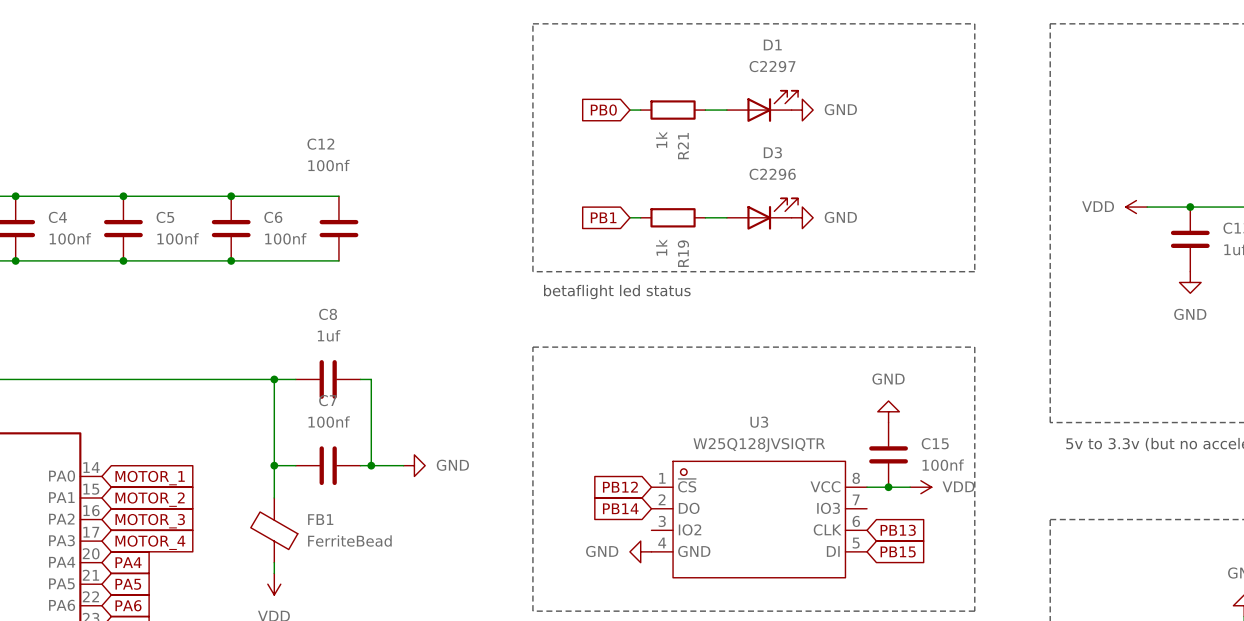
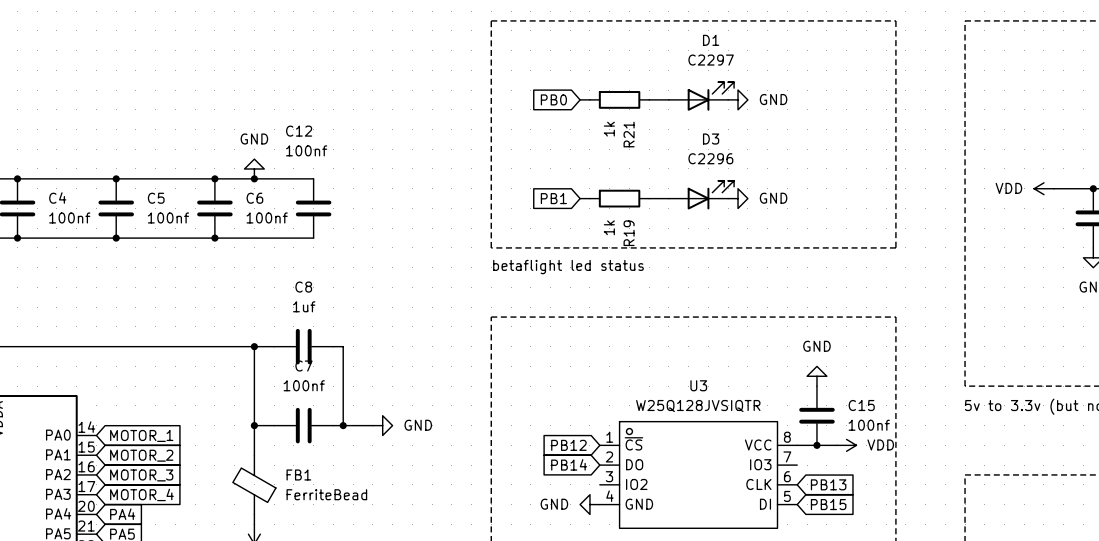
power symbol: none -> GND (254, 168)
junction: none -> (254, 178)

